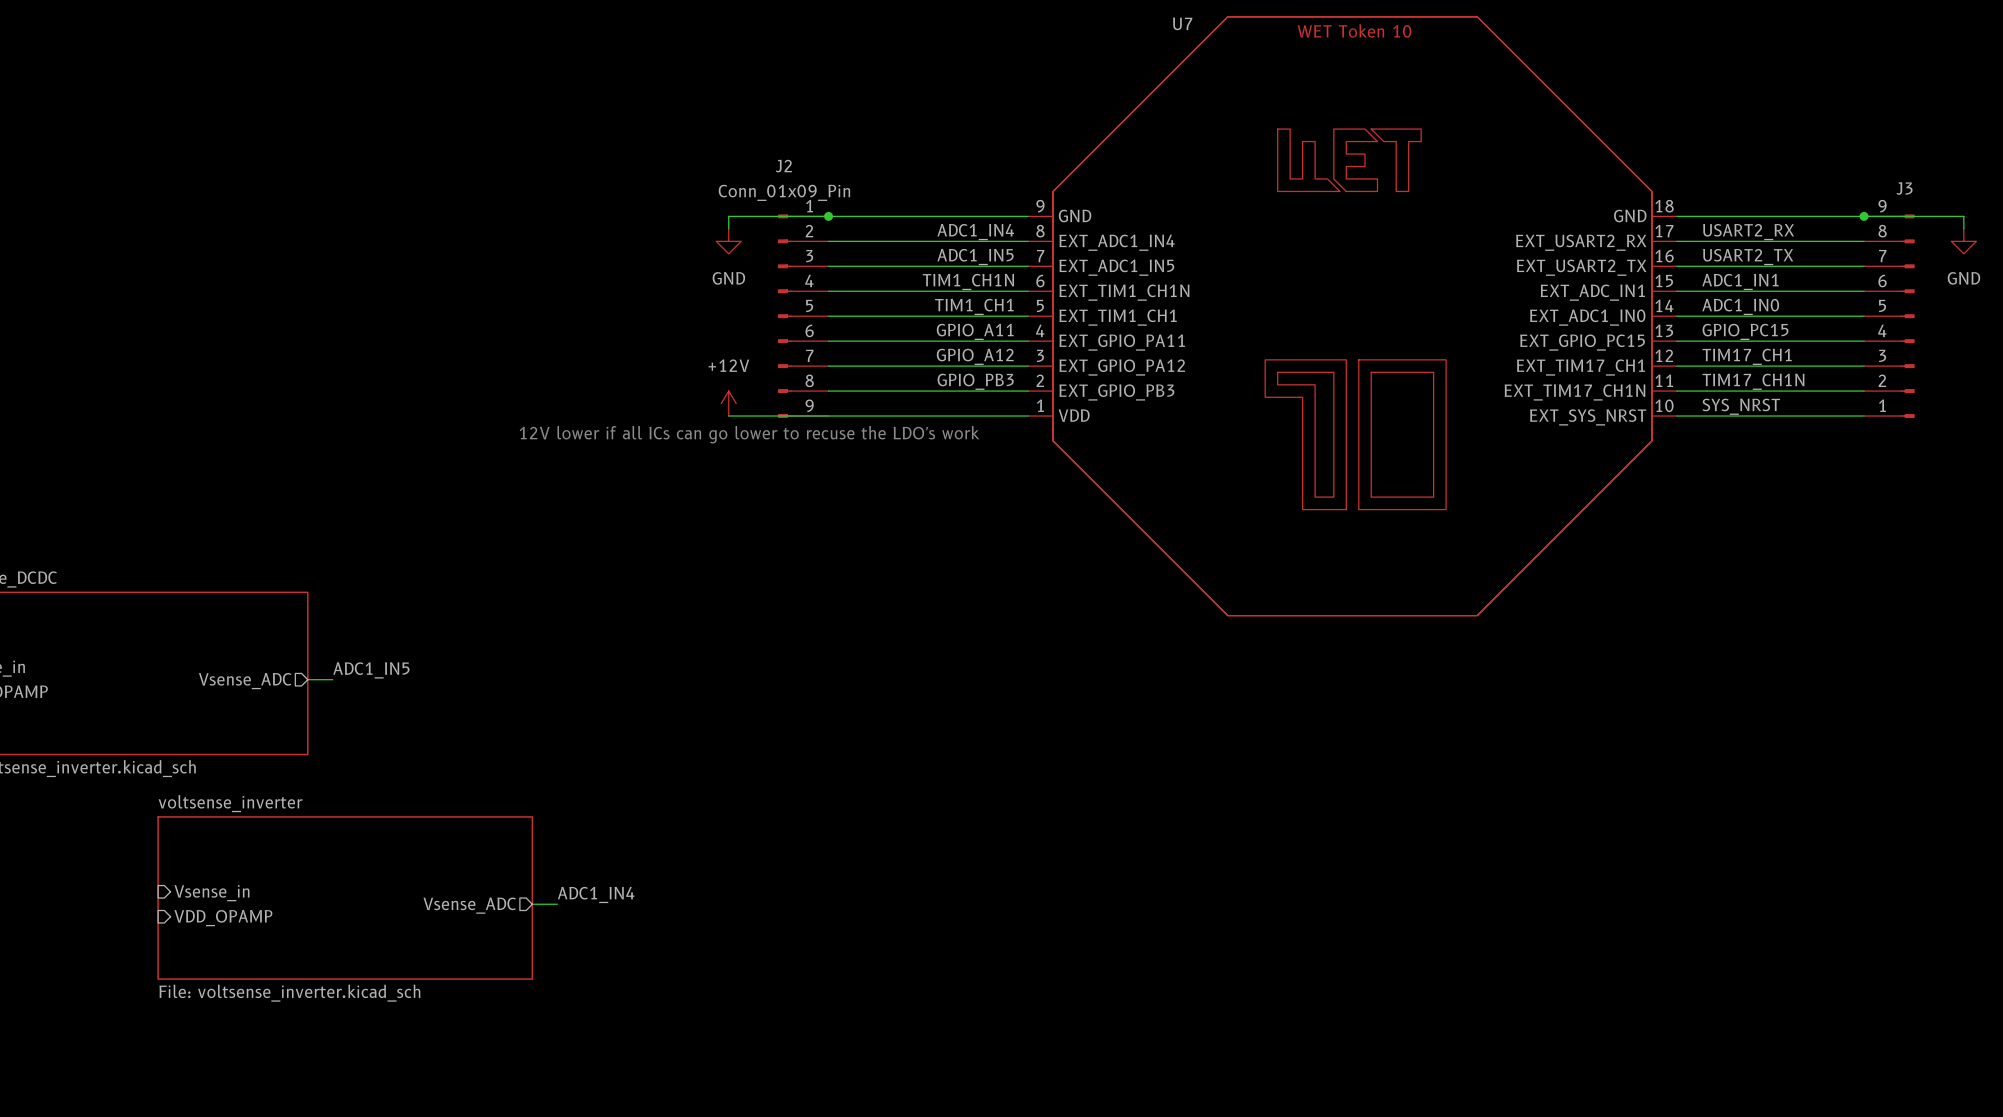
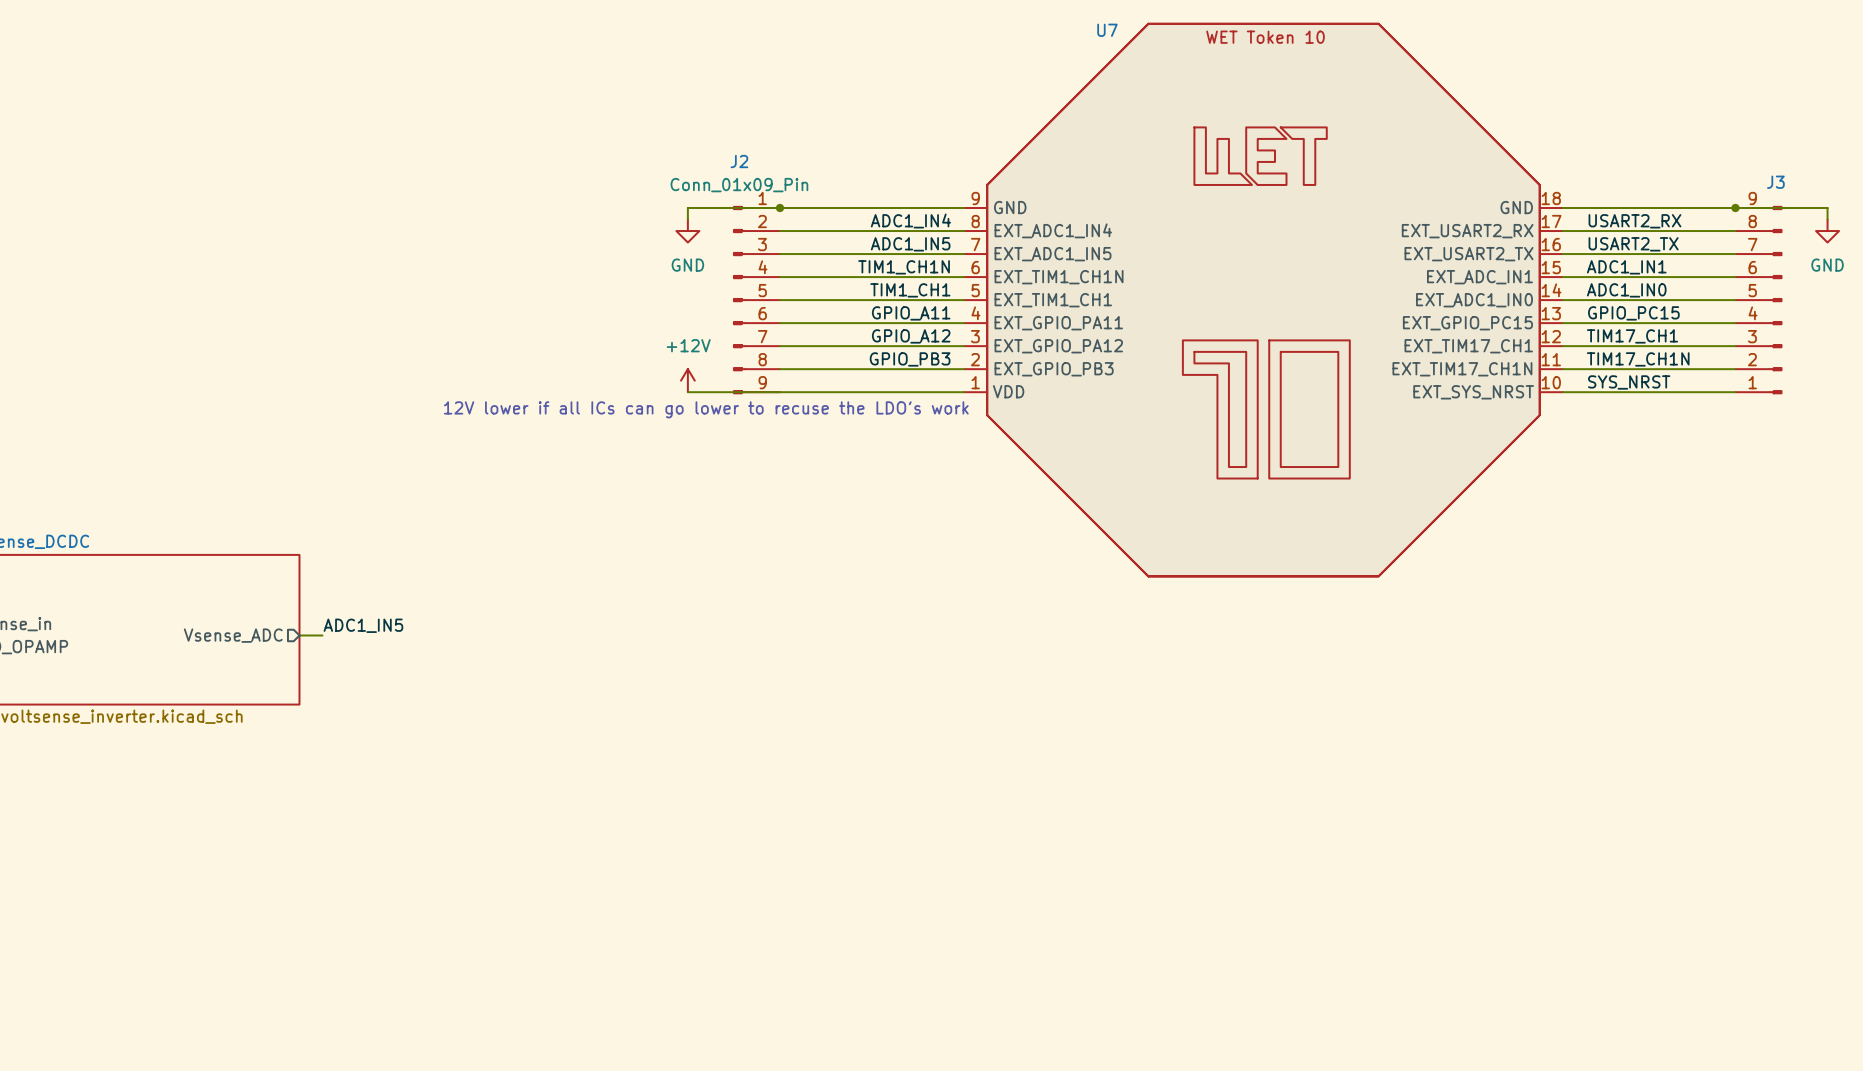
sheet pin: Vsense_in (211, 893) -> none
label: ADC1_IN4 (596, 894) -> none
sheet voltsense_inverter: File: voltsense_inverter.kicad_sch (345, 898) -> none
wire: (532, 904) (557, 904) -> none
sheet pin: Vsense_ADC (469, 905) -> none
sheet pin: VDD_OPAMP (223, 918) -> none

